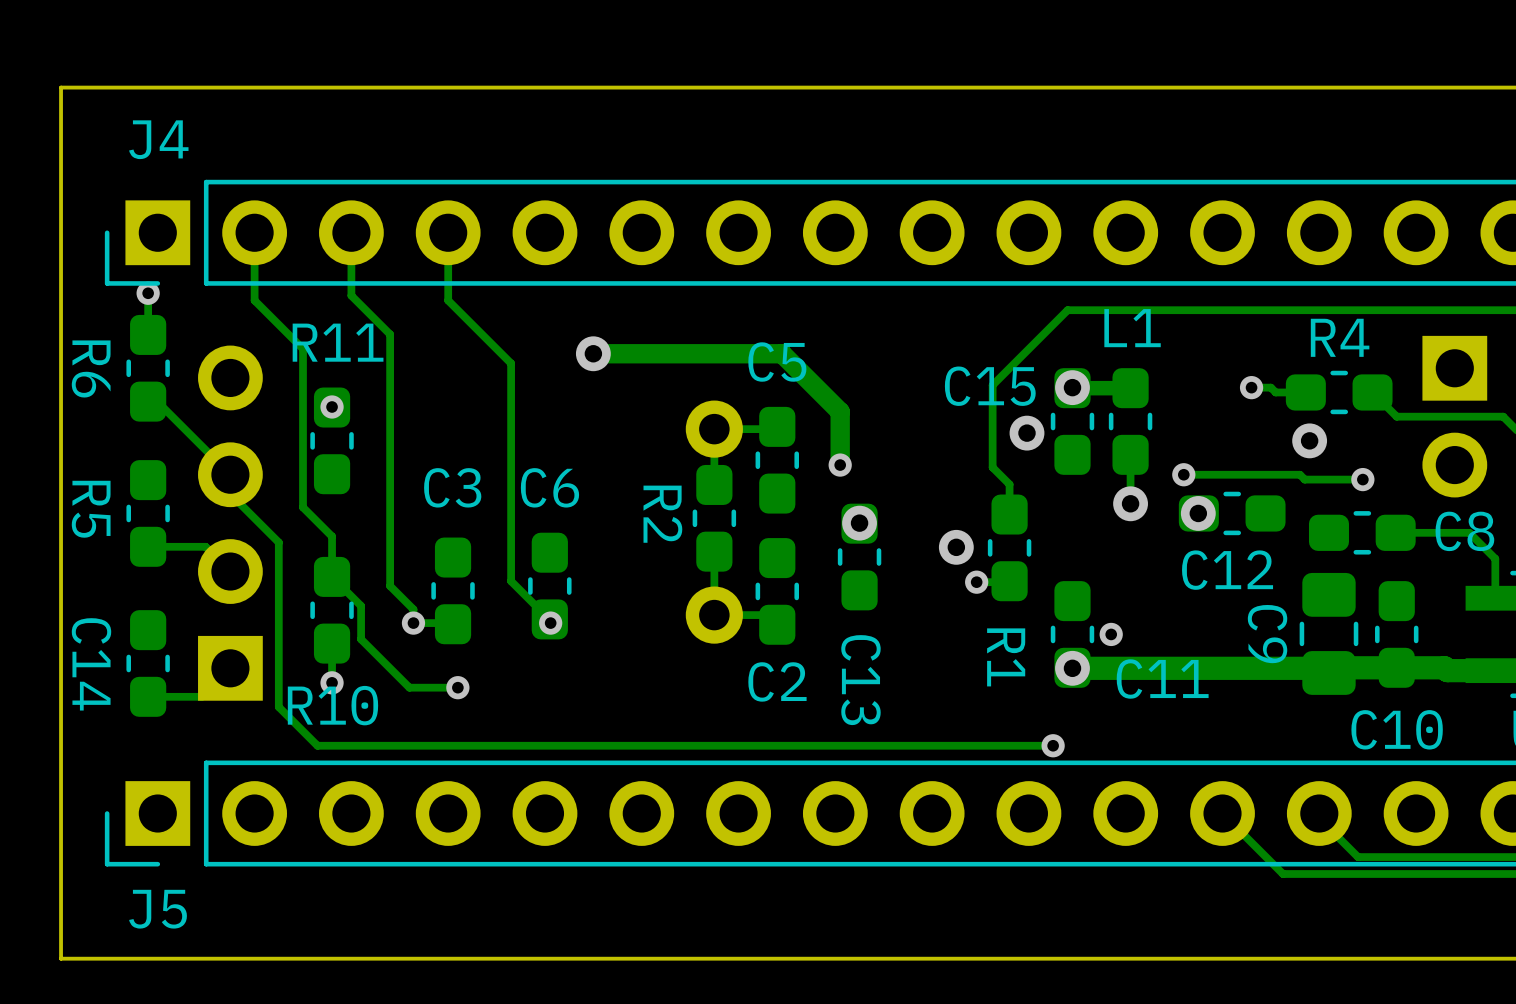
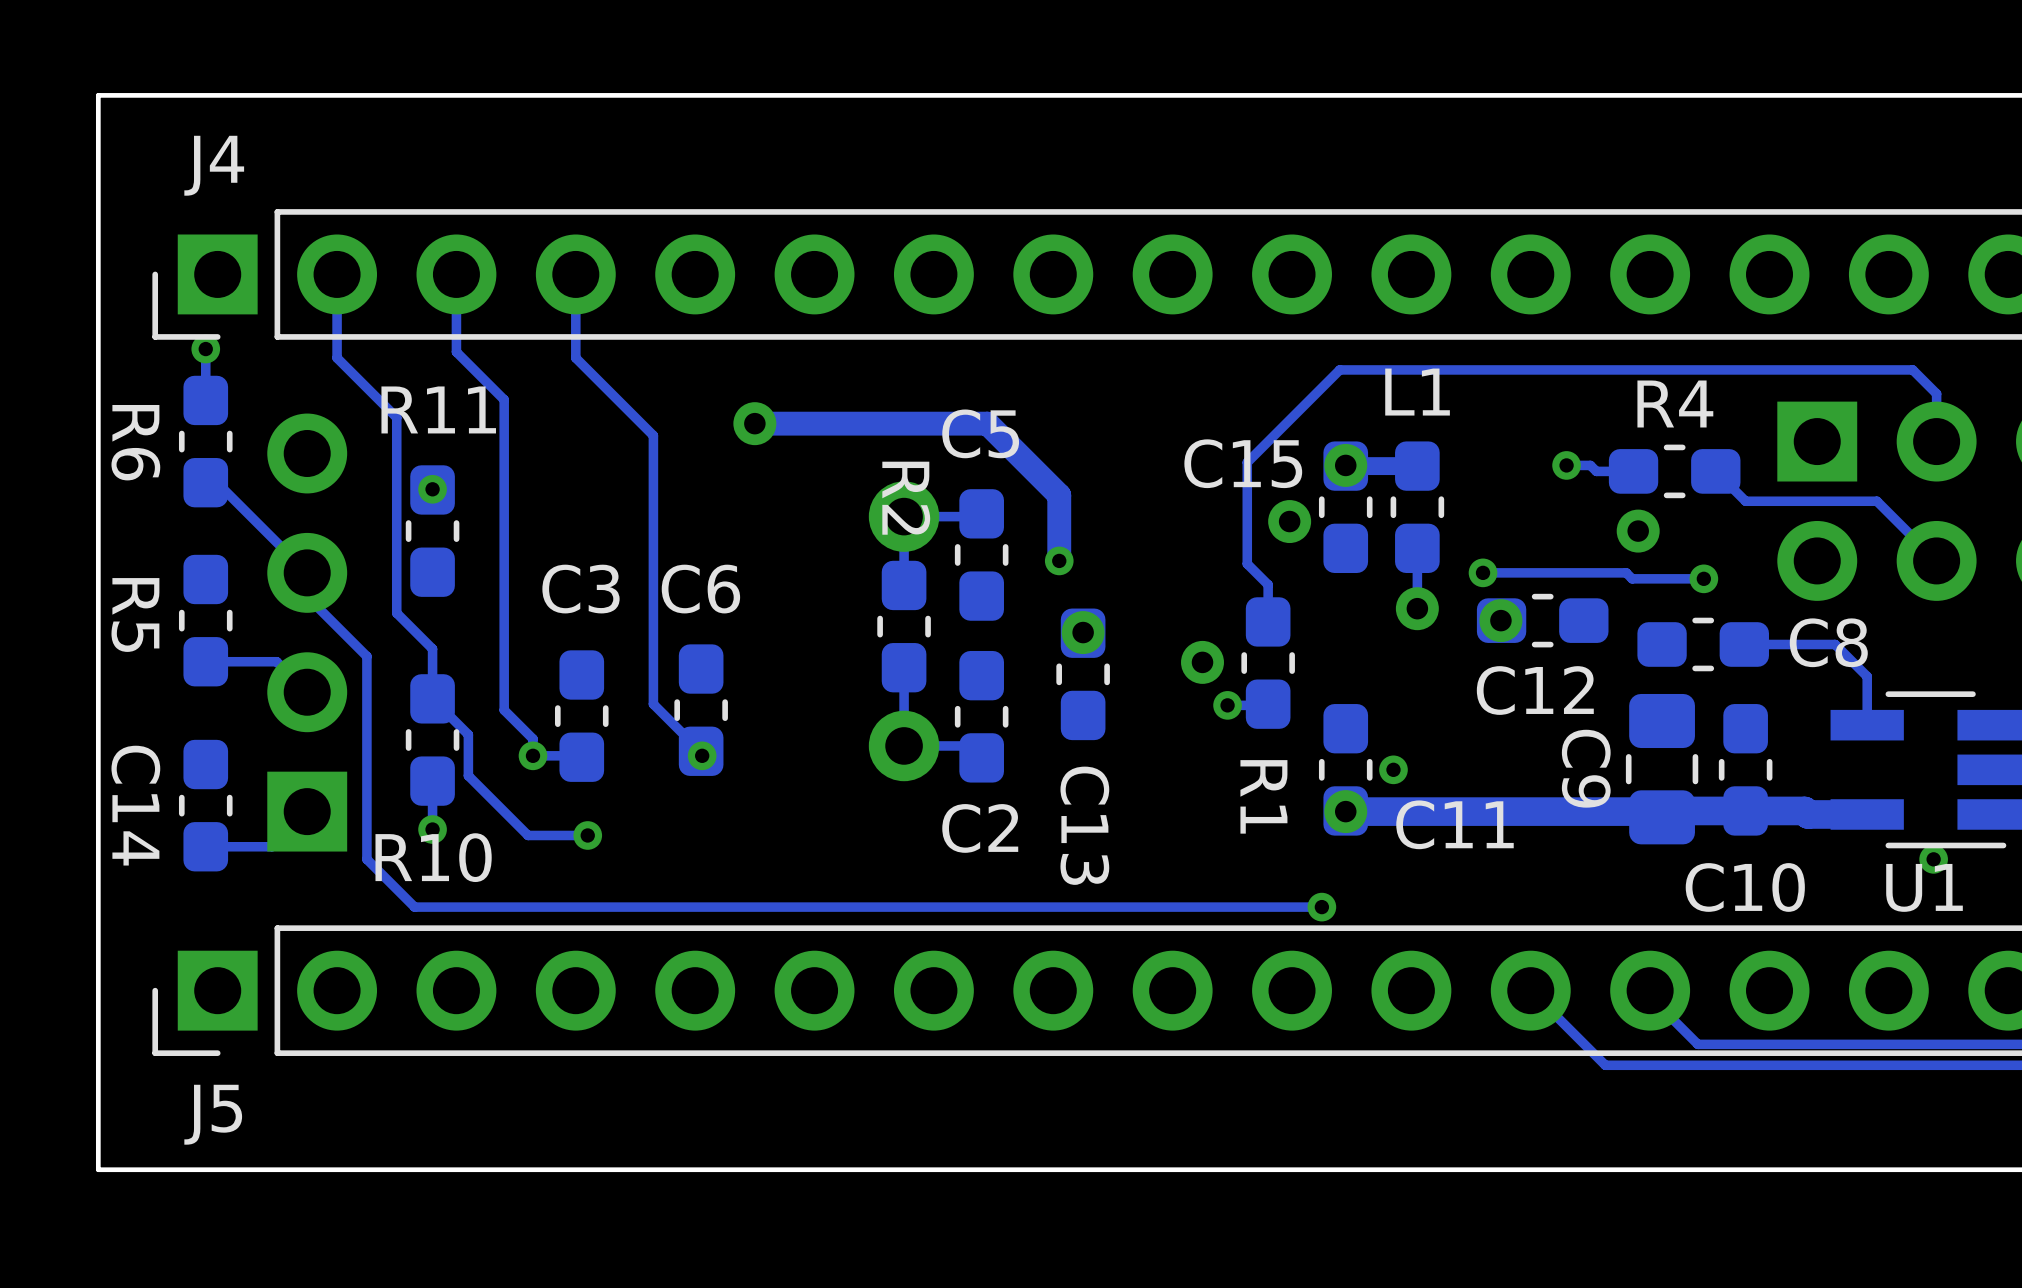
R2 name position: R2 (662, 514) -> R2 (906, 498)

